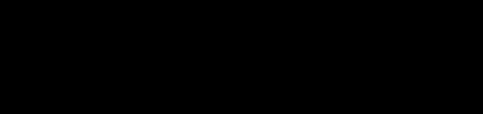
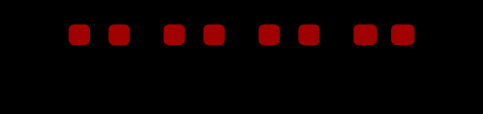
part: none -> (99, 34)
part: none -> (194, 34)
part: none -> (289, 34)
part: none -> (384, 34)

